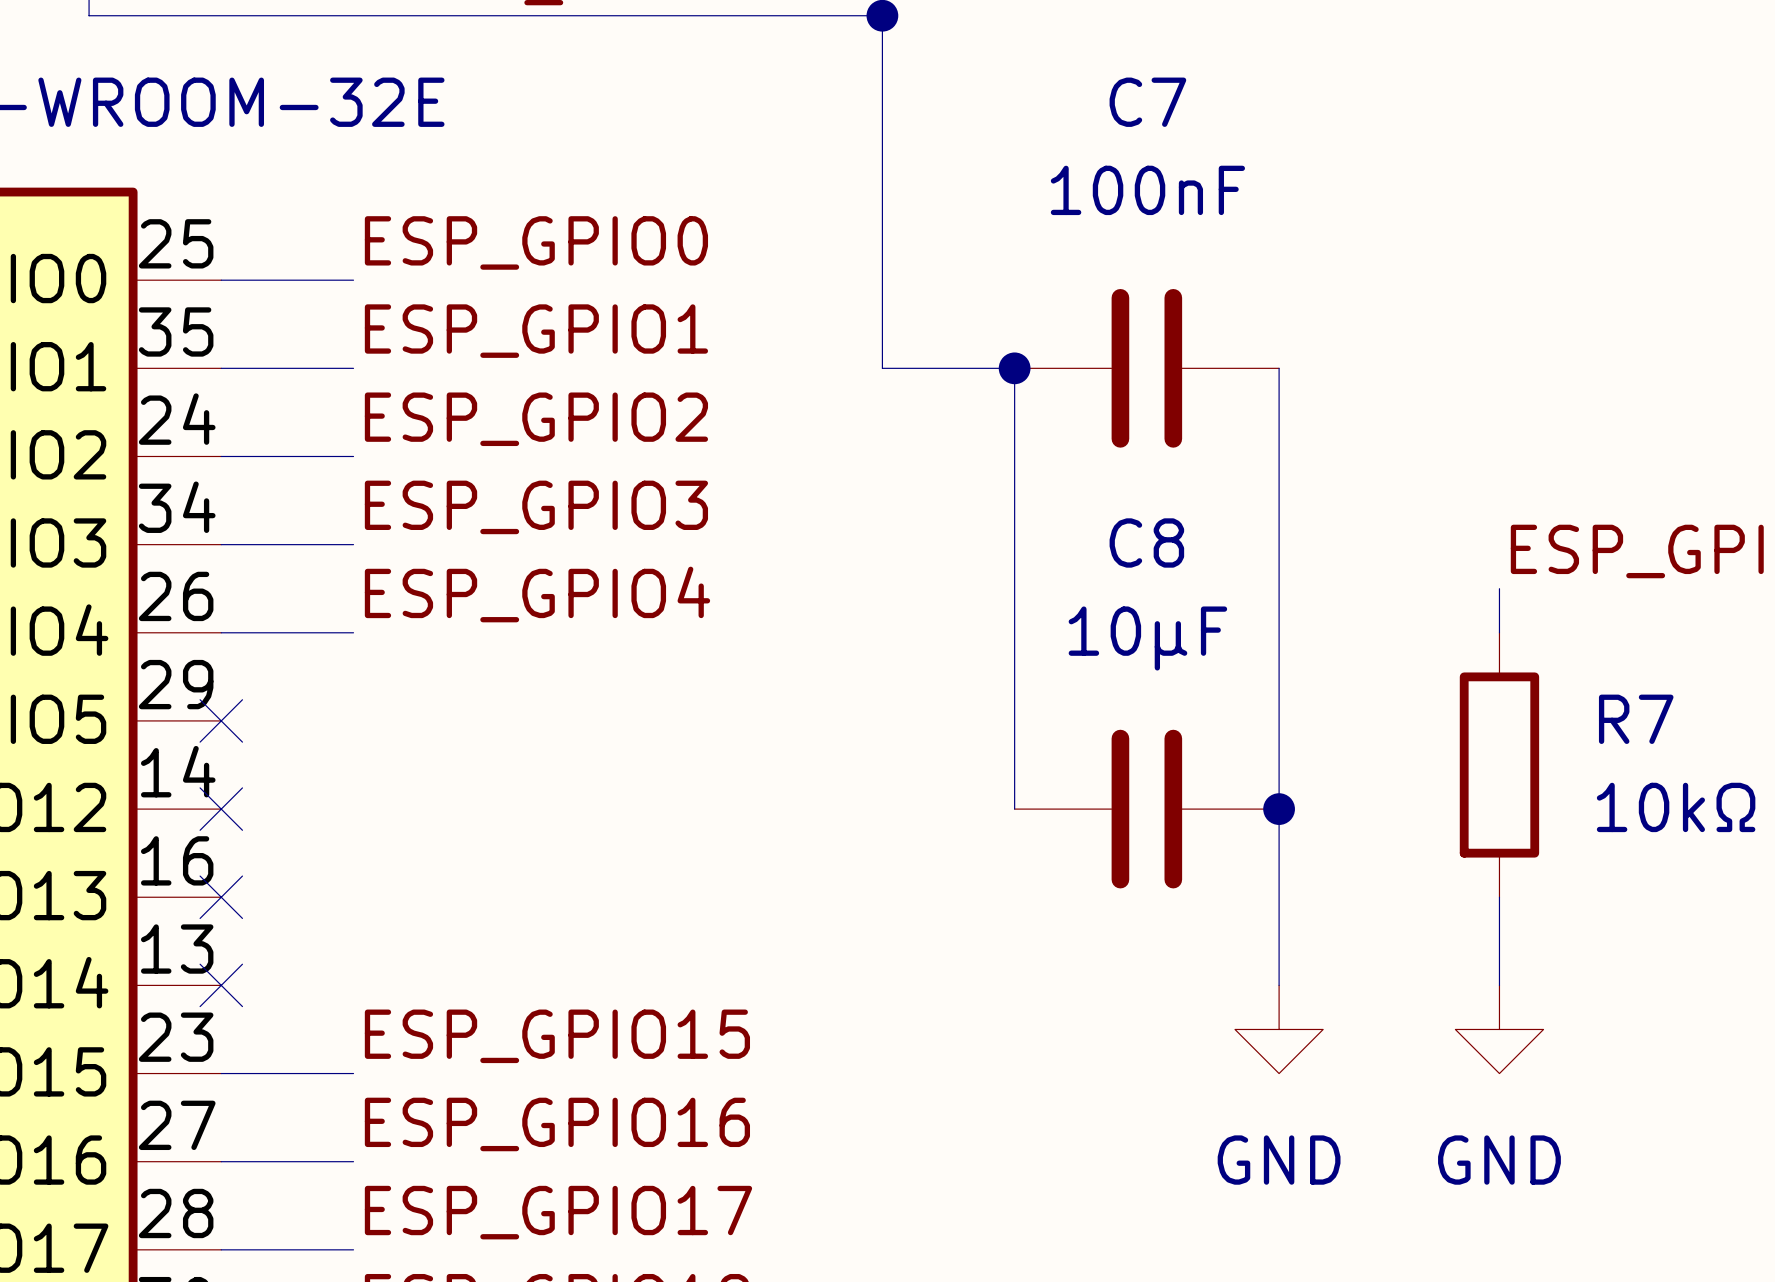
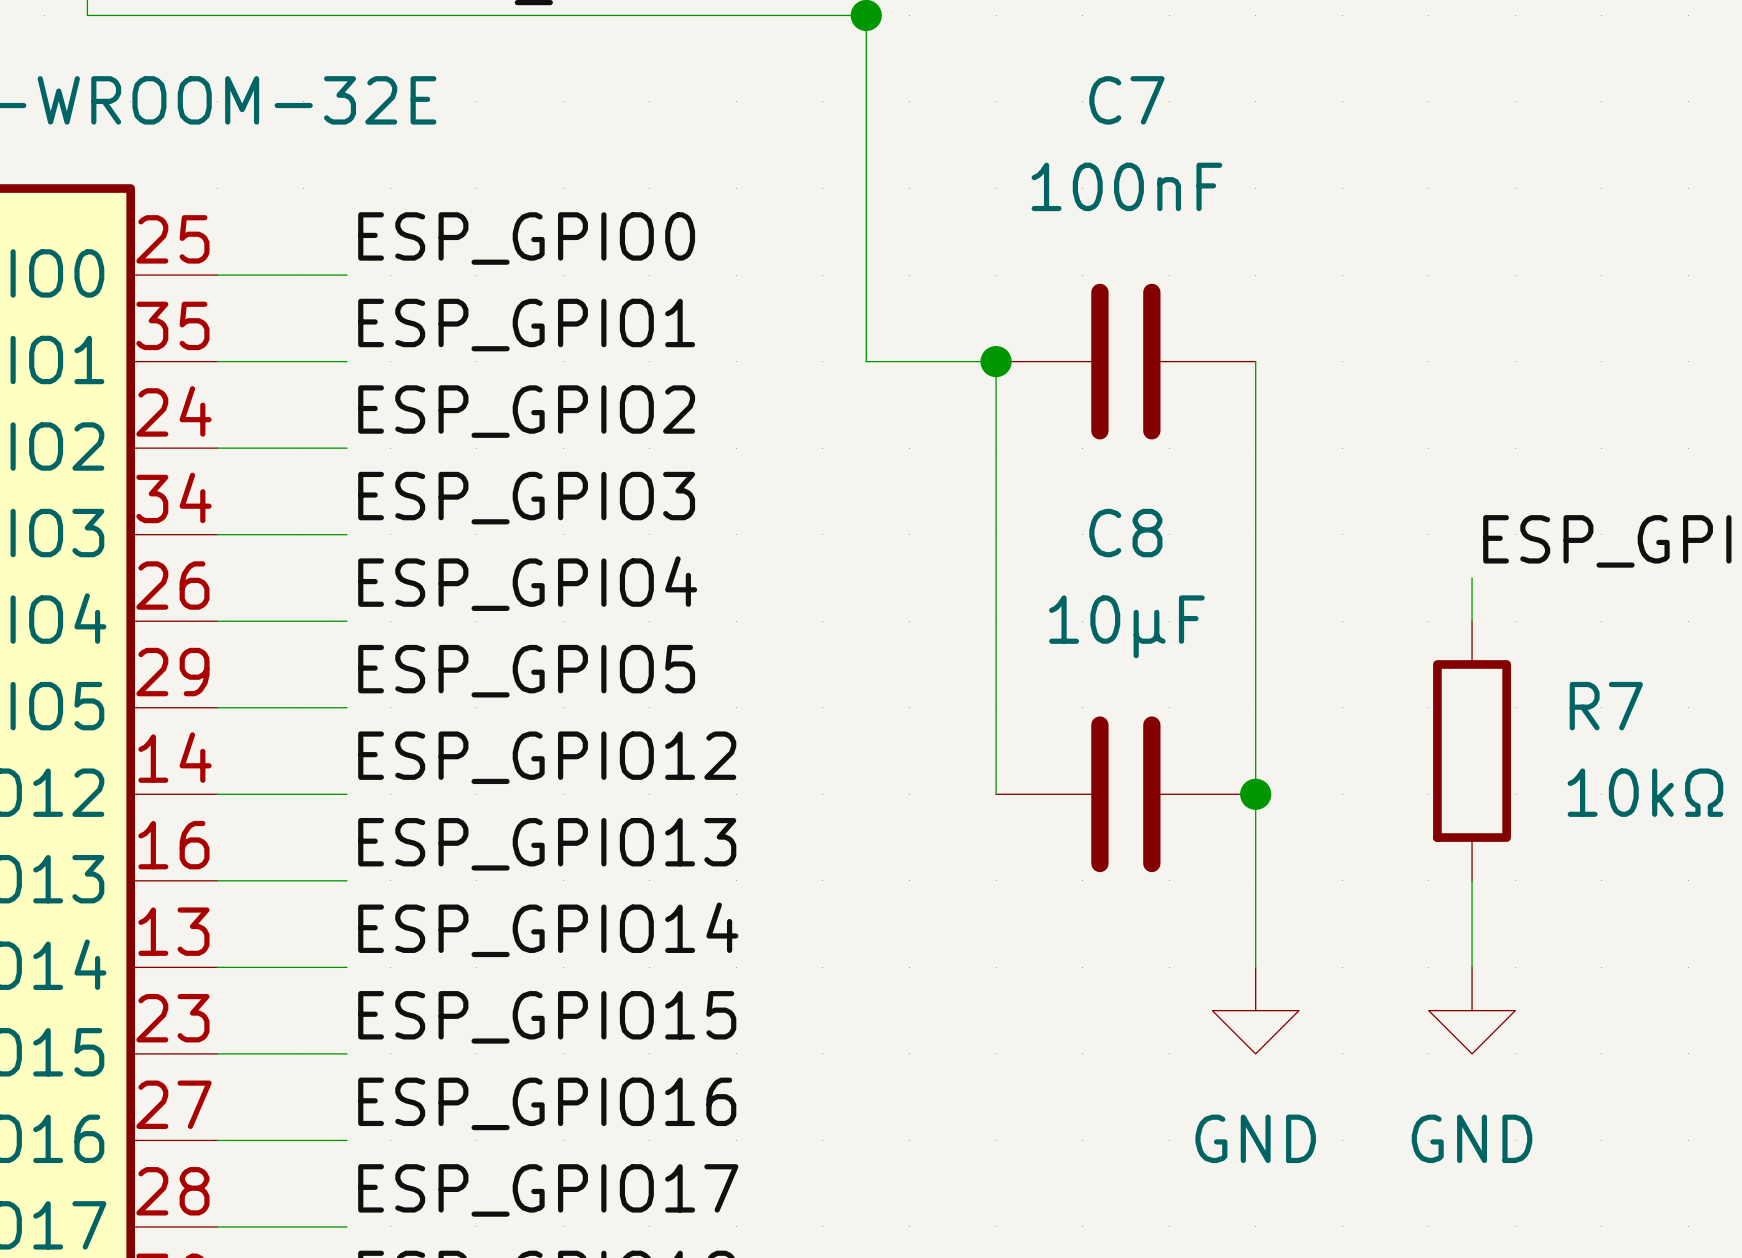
label: none -> ESP_GPIO5 (526, 671)
wire: none -> (217, 707) (347, 707)
no-connect mark: (221, 720) -> none
label: none -> ESP_GPIO12 (547, 757)
wire: none -> (217, 794) (347, 794)
no-connect mark: (221, 809) -> none
label: none -> ESP_GPIO13 (547, 844)
wire: none -> (217, 880) (347, 880)
no-connect mark: (221, 897) -> none
label: none -> ESP_GPIO14 (548, 929)
wire: none -> (217, 967) (347, 967)
no-connect mark: (221, 985) -> none

